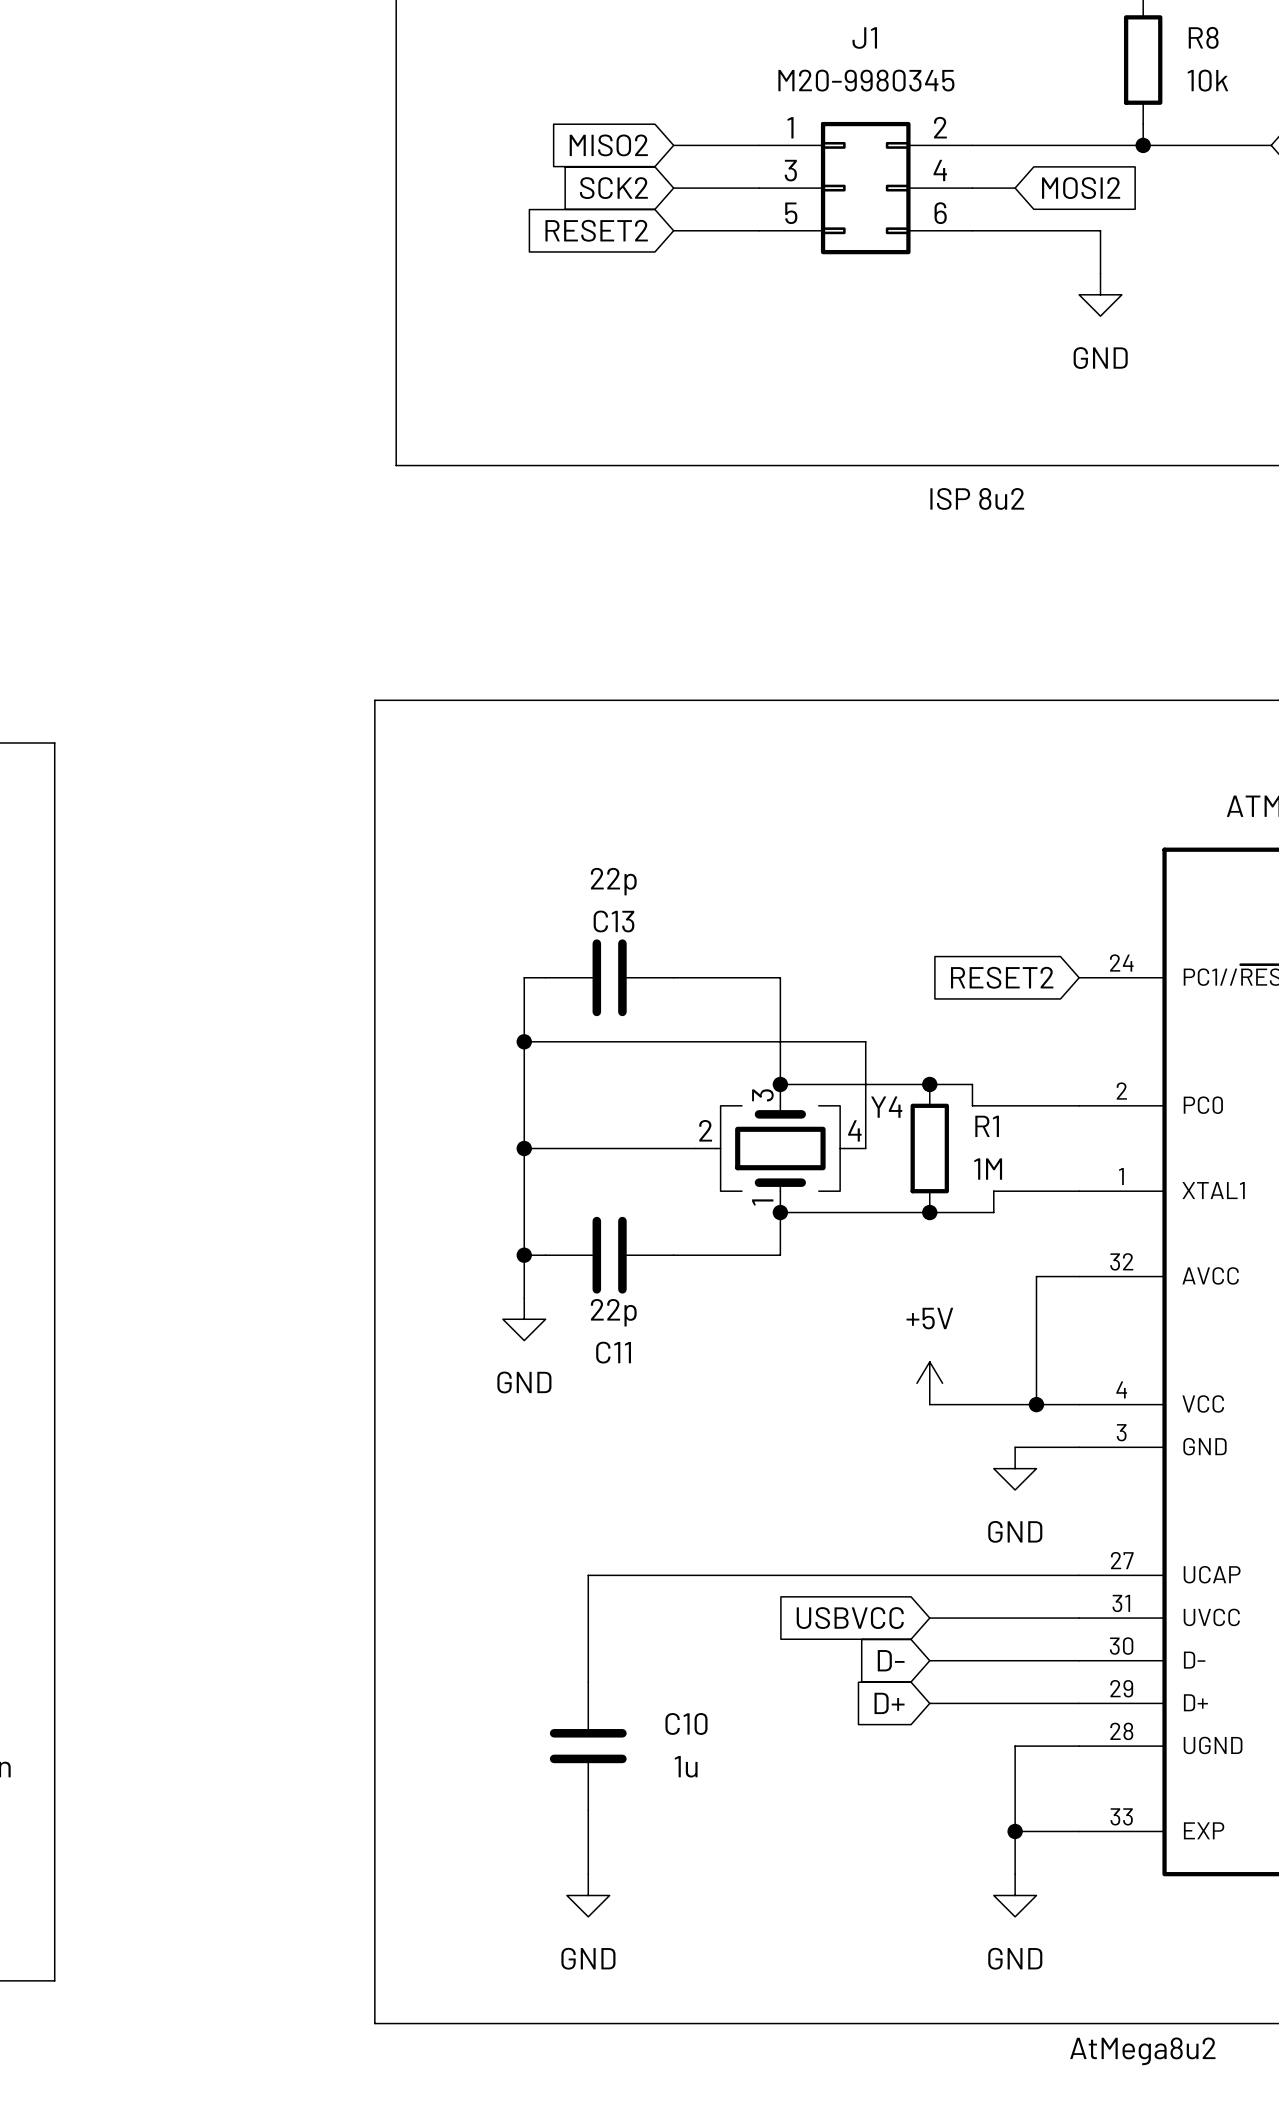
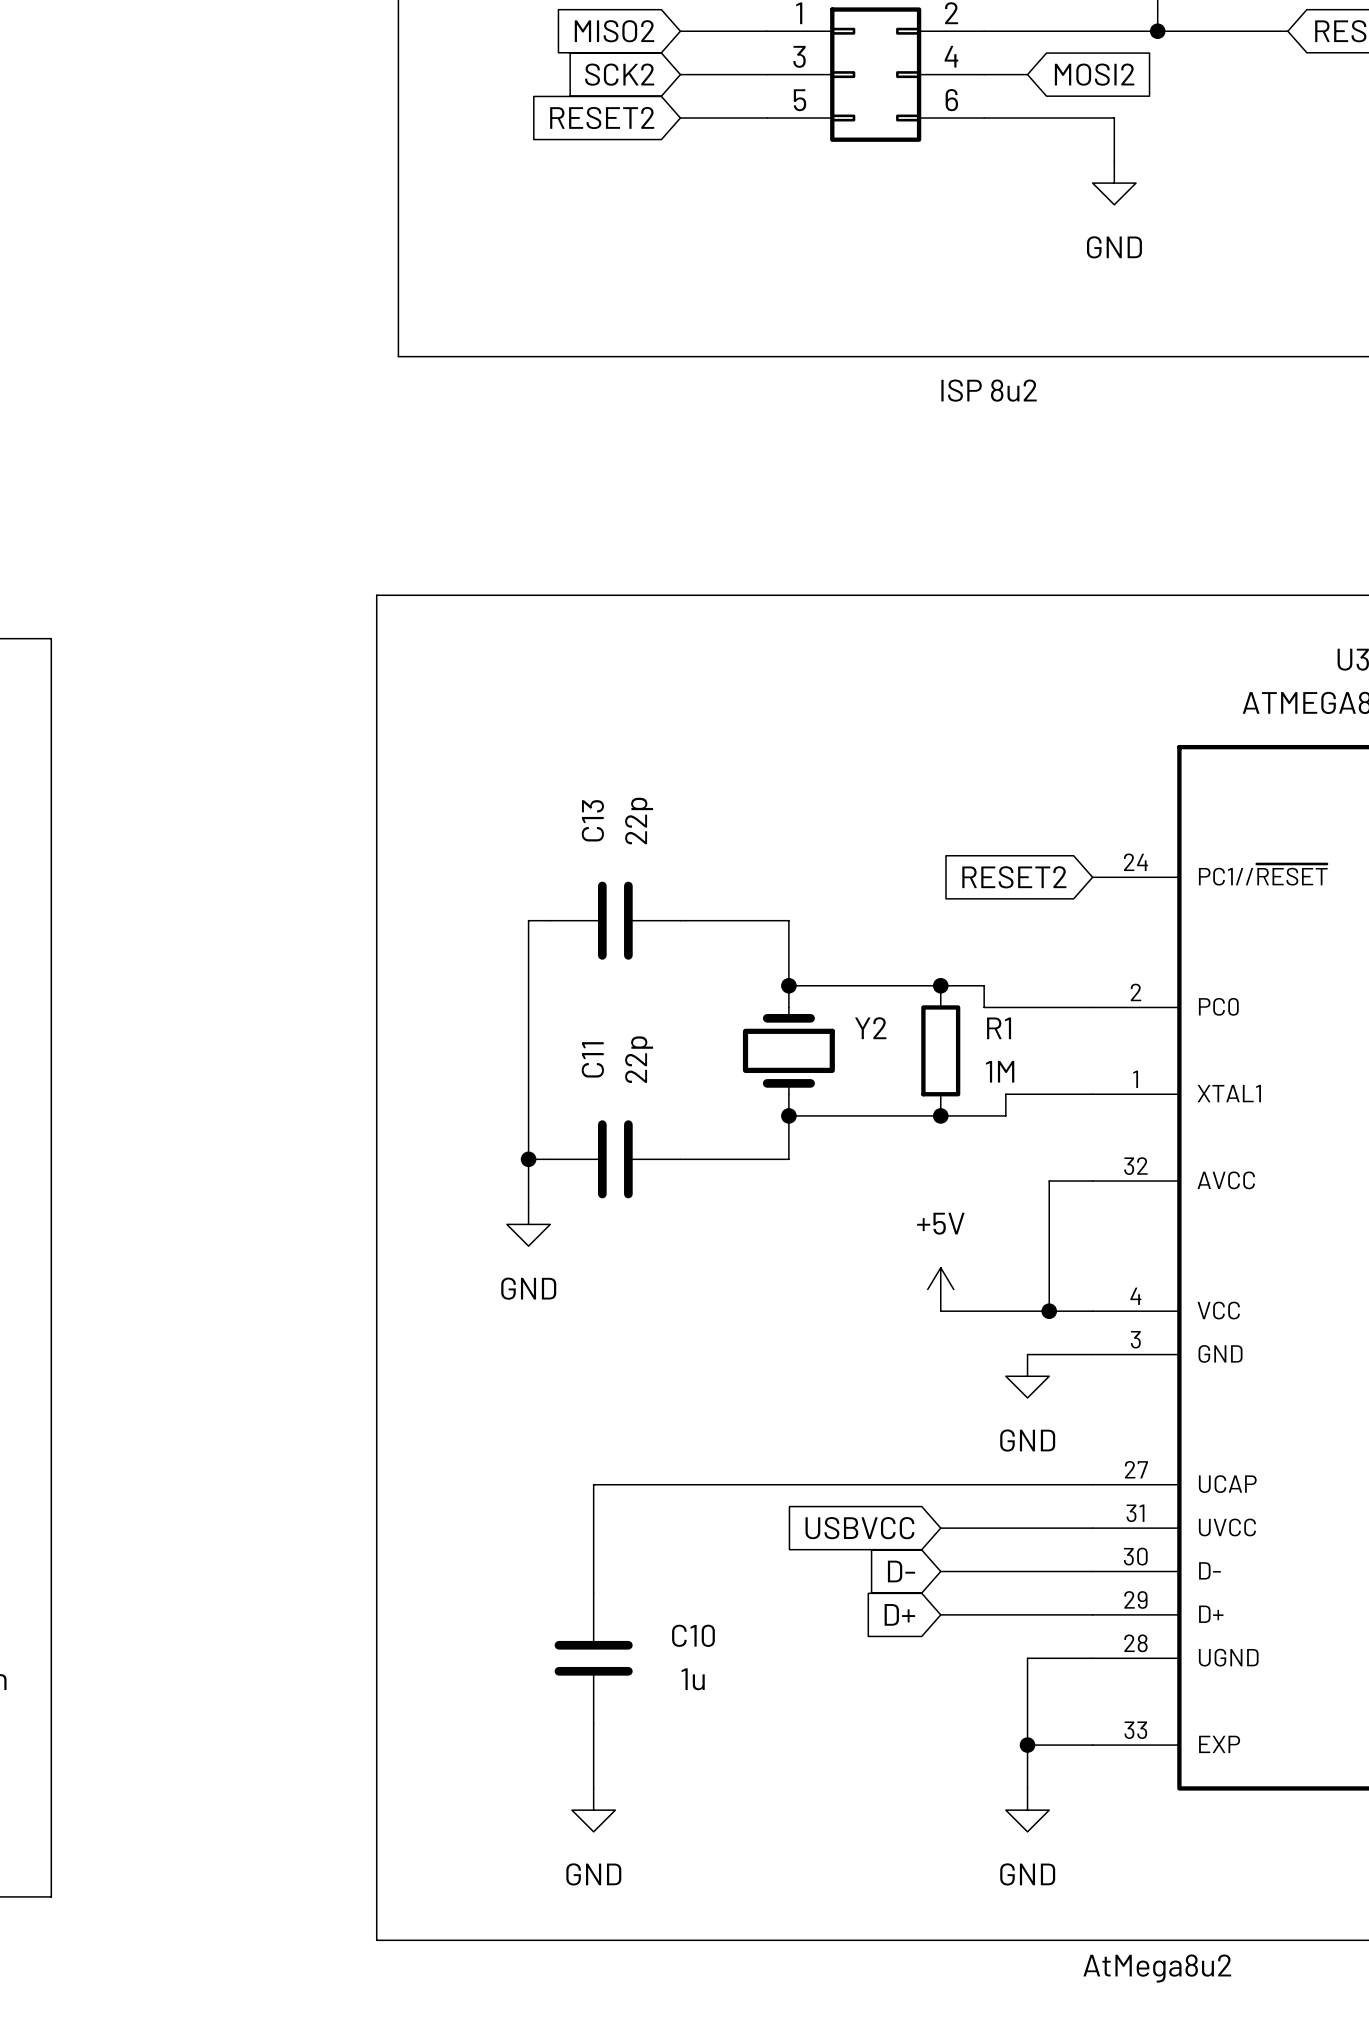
C13 value rotation: 0° (613, 881) -> 90° counterclockwise (639, 821)
C13 name rotation: 0° (614, 921) -> 90° counterclockwise (592, 820)
wire: (545, 977) (524, 977) (524, 1020) -> (550, 920) (528, 920)
C13 position: (609, 977) -> (615, 920)
wire: (673, 977) (780, 977) (780, 1020) -> (680, 920) (788, 920)
wire: (524, 1041) (865, 1041) (865, 1148) -> none
junction: (524, 1041) -> none
wire: (524, 1148) (694, 1148) -> none
junction: (524, 1148) -> none
Y4: (780, 1148) -> none
Y2: none -> (788, 1050)
C11 value rotation: 0° (613, 1312) -> 90° counterclockwise (639, 1059)
C11 value position: 22p (613, 1312) -> 22p (639, 1059)
C11 name rotation: 0° (613, 1352) -> 90° counterclockwise (592, 1059)
C11 name position: C11 (613, 1352) -> C11 (592, 1059)

